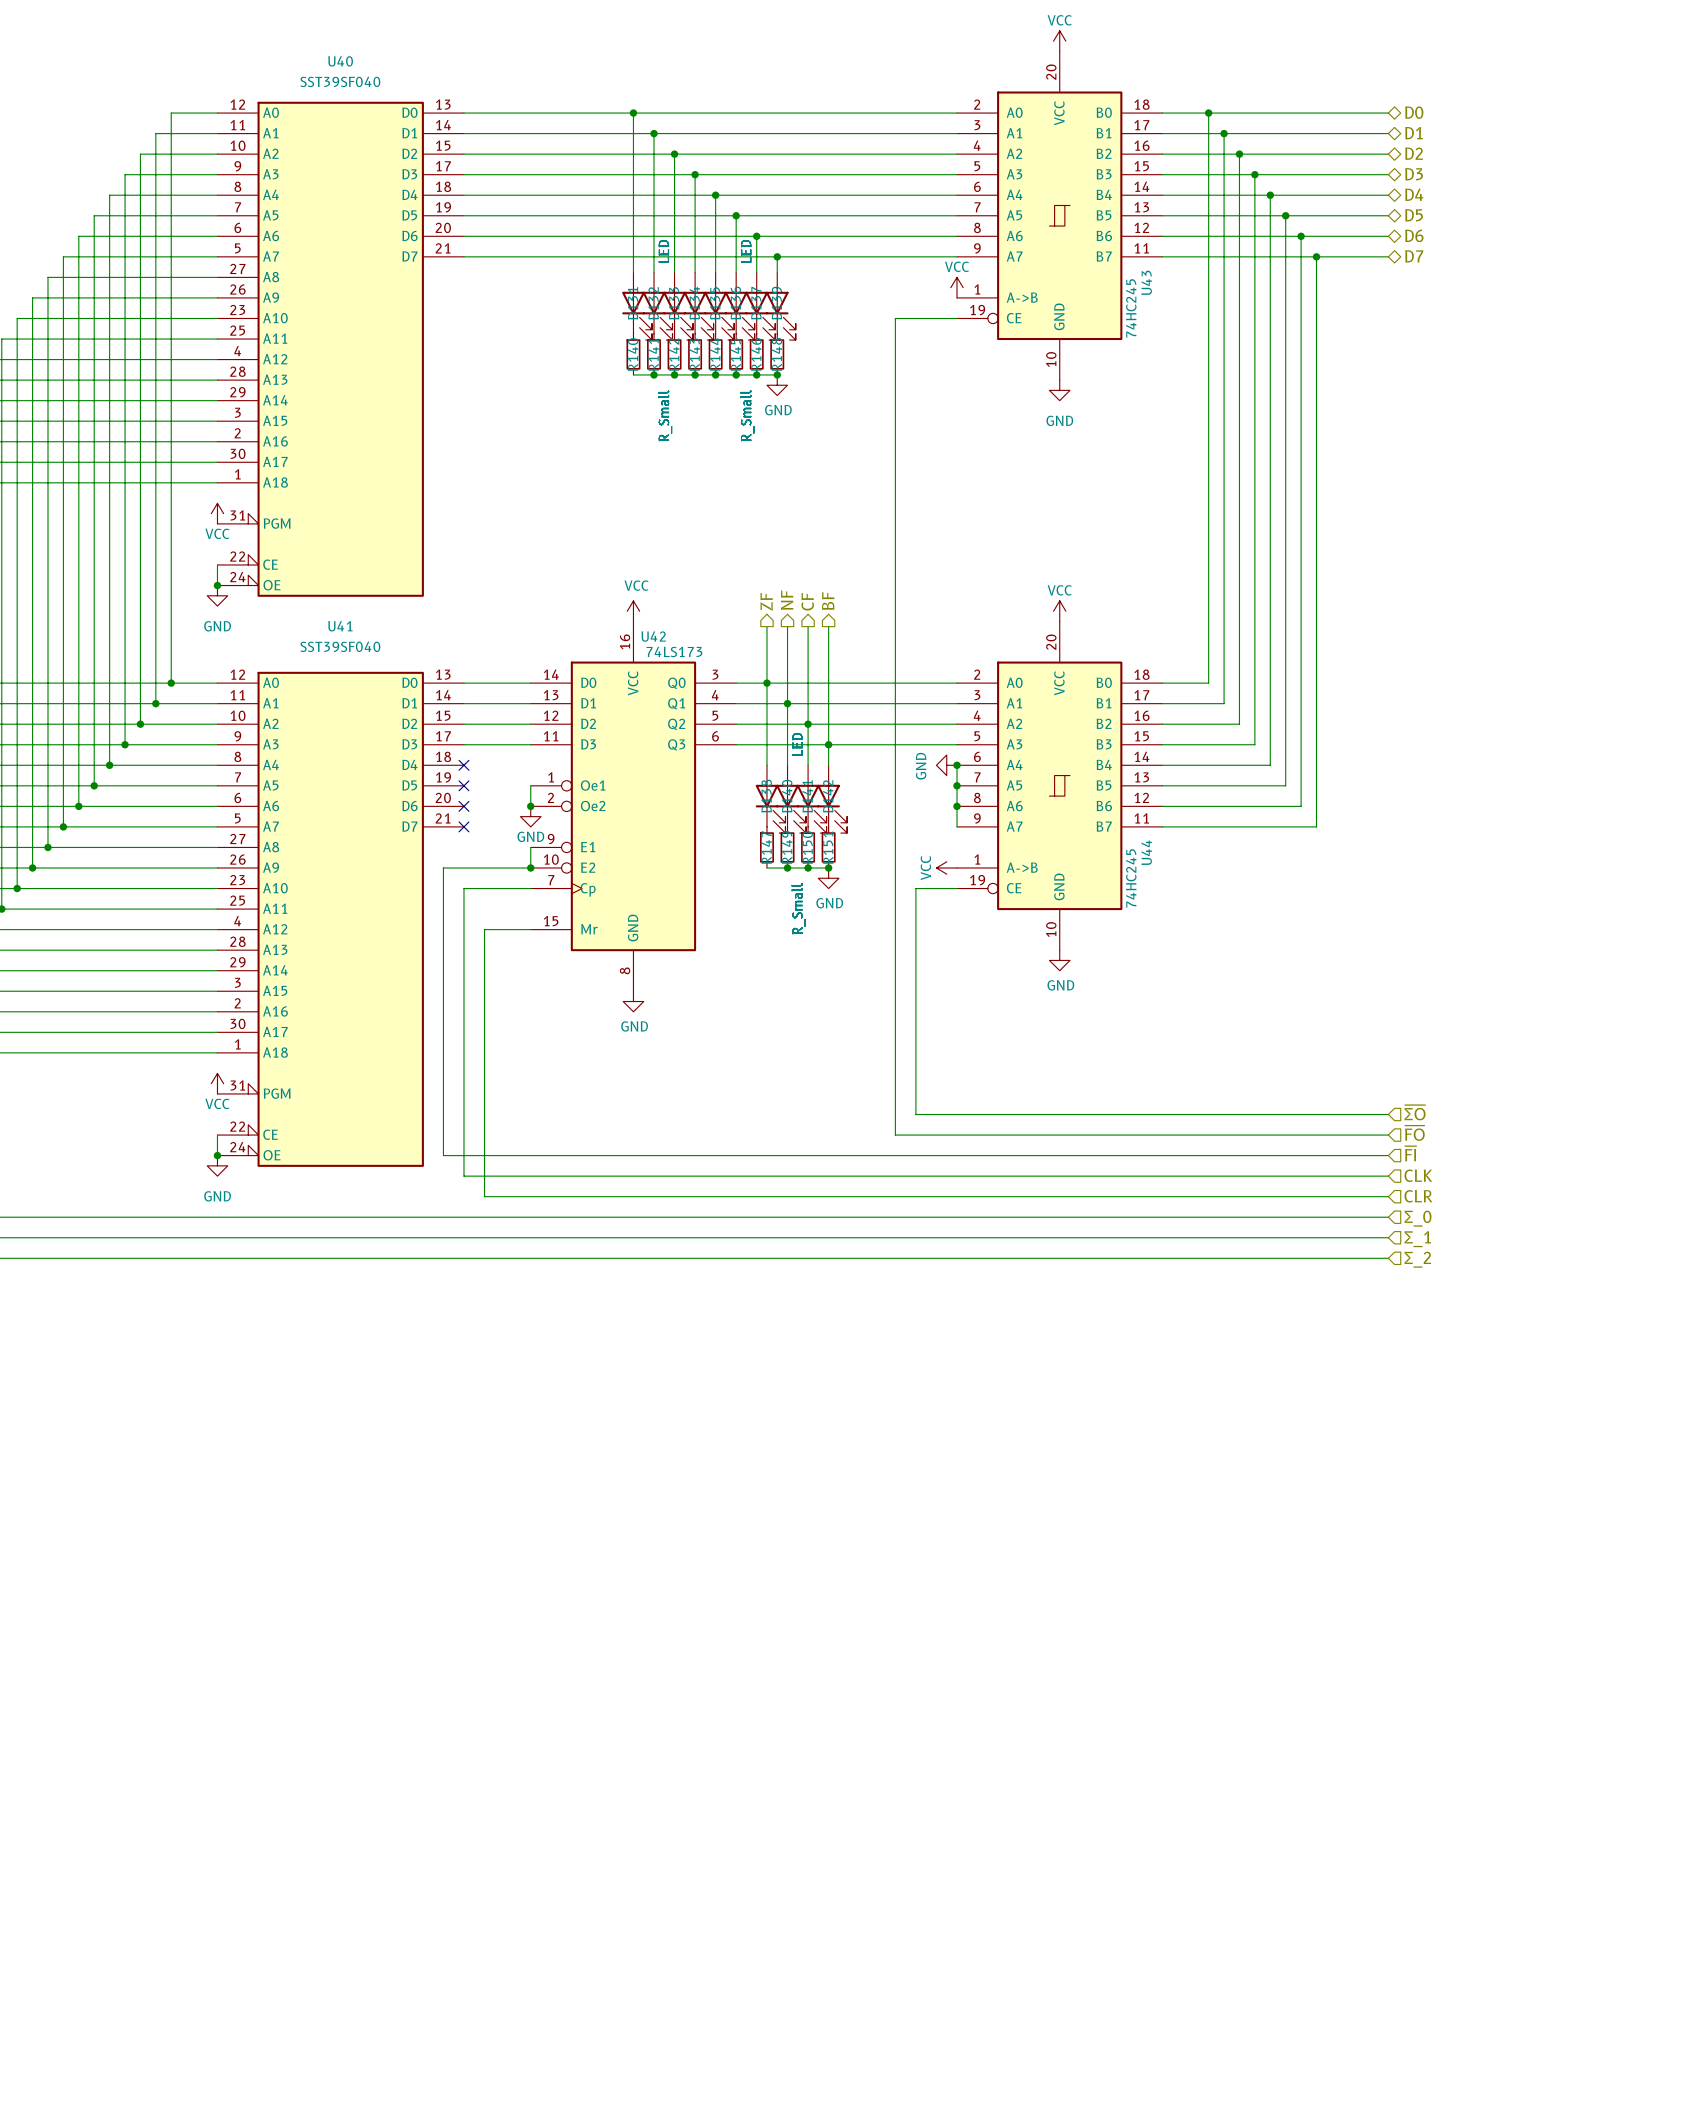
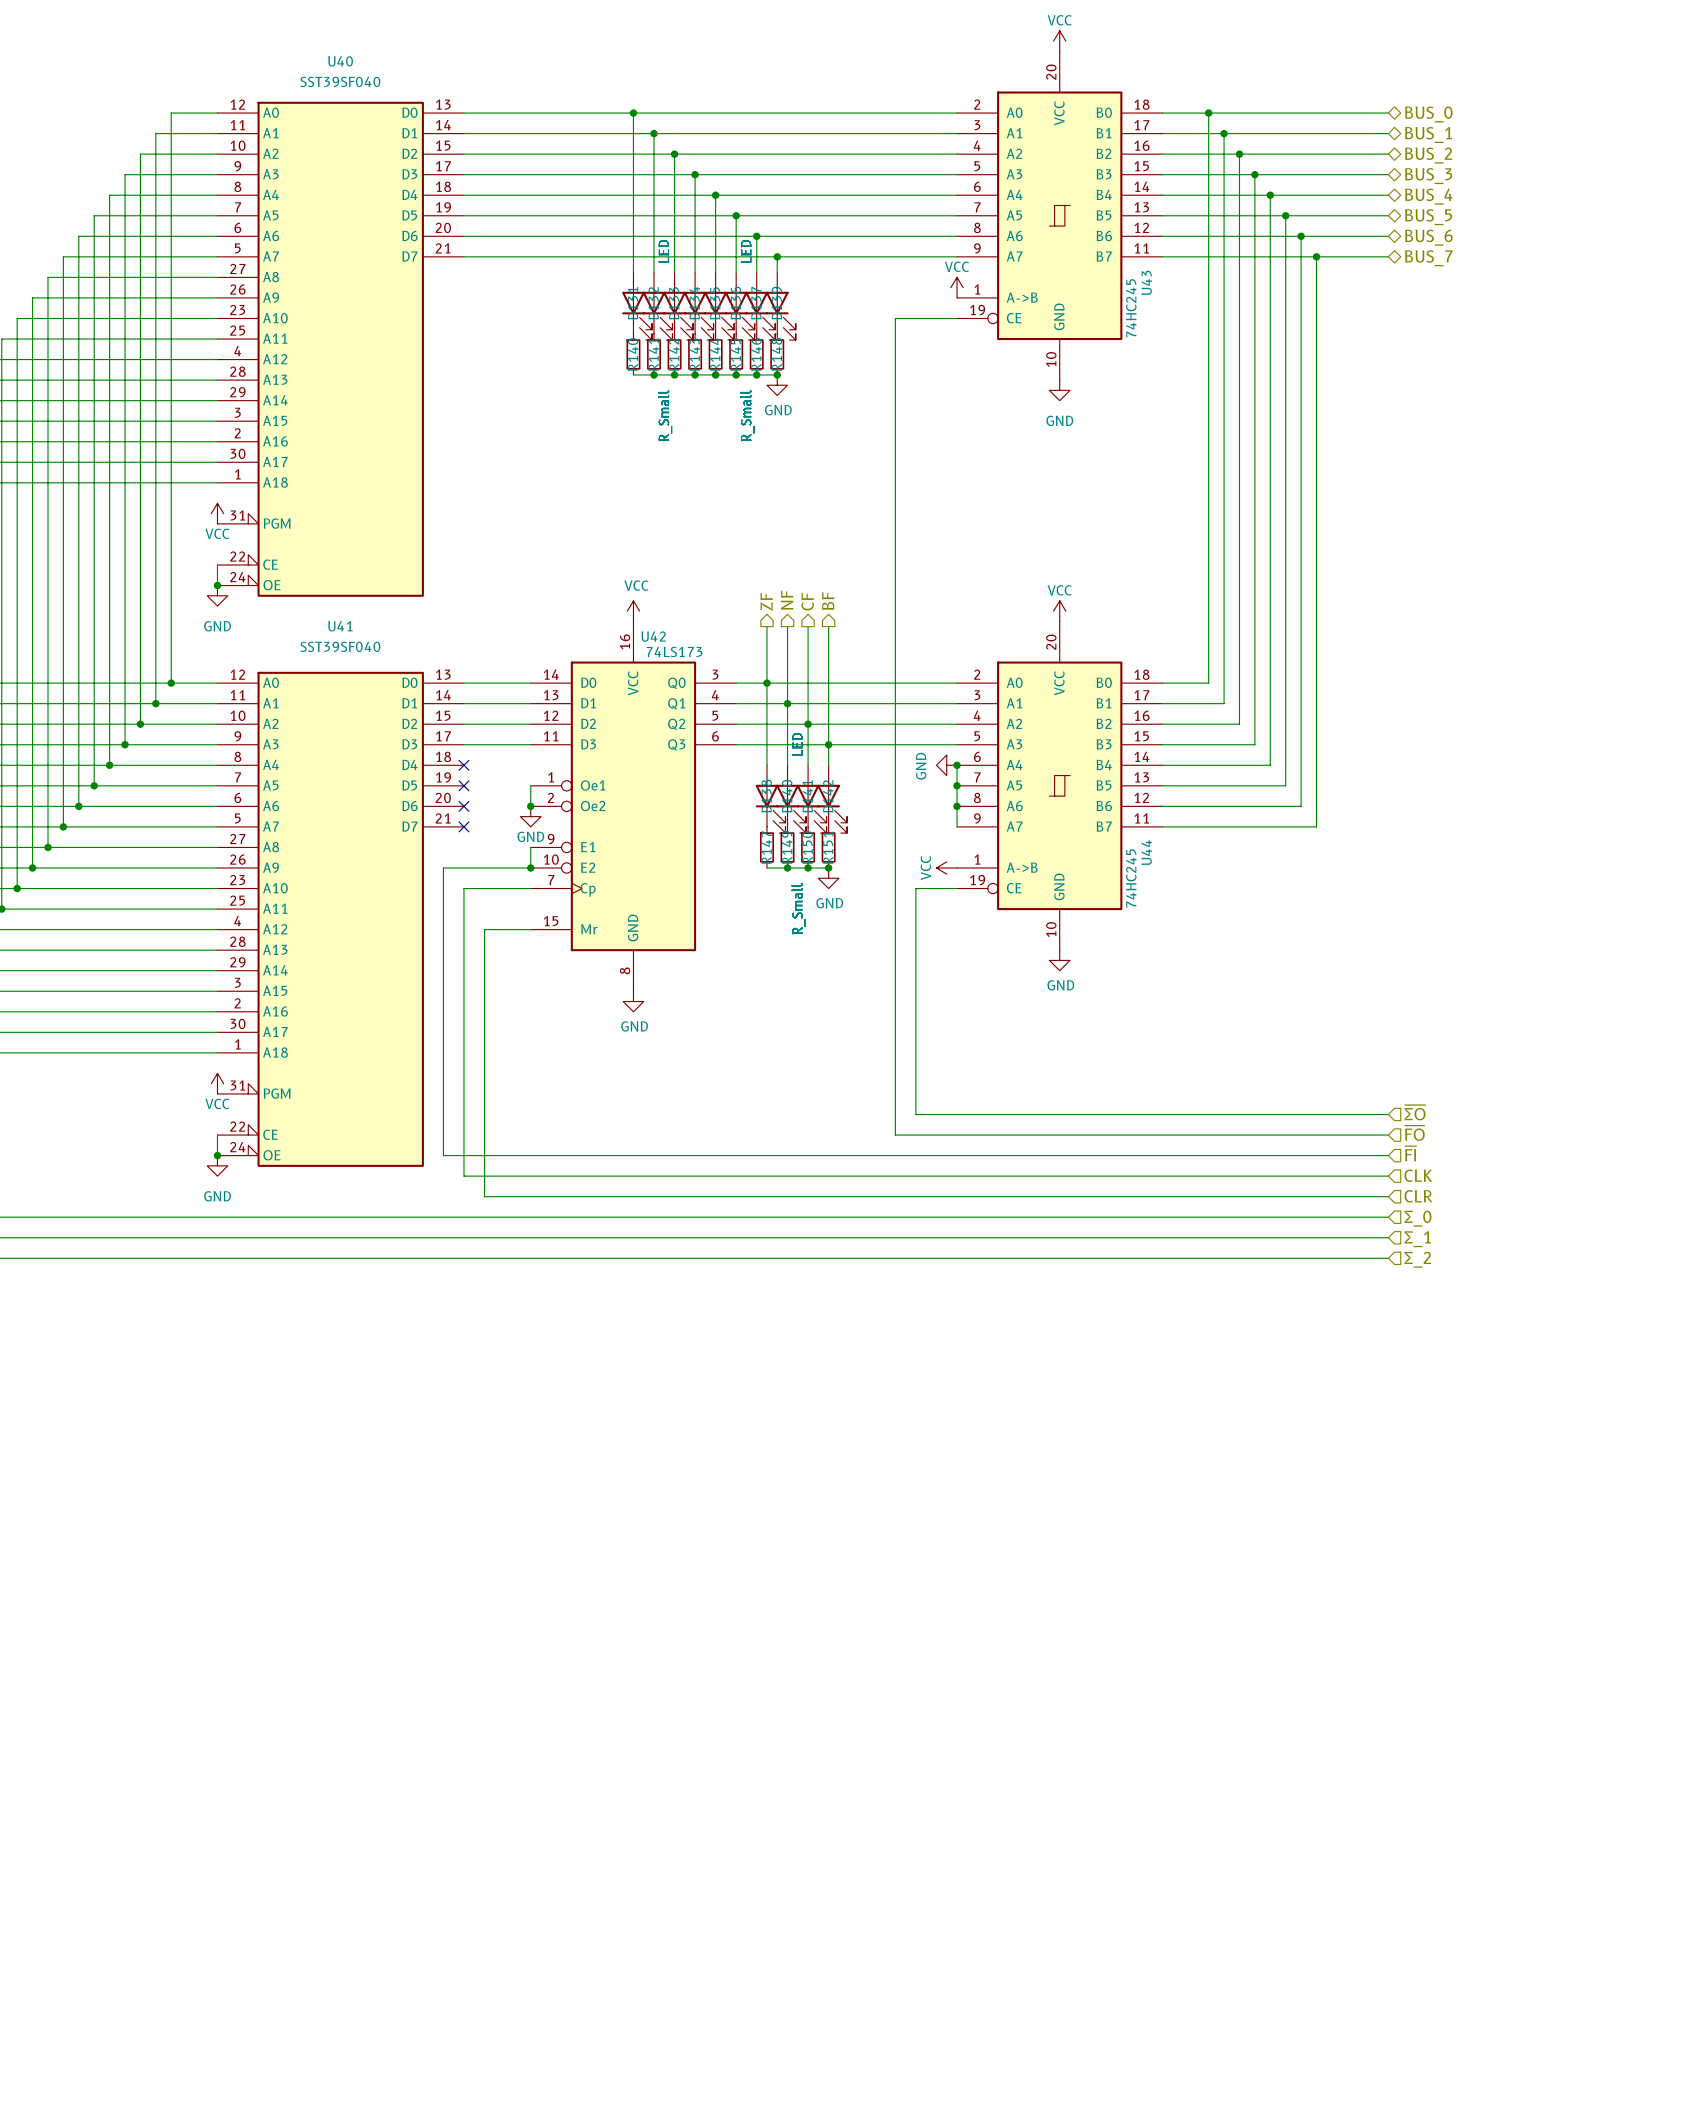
hierarchical label: D0 (1414, 112) -> BUS_0 (1428, 114)
hierarchical label: D1 (1414, 133) -> BUS_1 (1428, 134)
hierarchical label: D2 (1414, 153) -> BUS_2 (1428, 155)
hierarchical label: D3 (1414, 174) -> BUS_3 (1428, 176)
hierarchical label: D4 (1414, 194) -> BUS_4 (1428, 196)
hierarchical label: D5 (1414, 215) -> BUS_5 (1428, 217)
hierarchical label: D6 (1414, 235) -> BUS_6 (1428, 237)
hierarchical label: D7 (1414, 256) -> BUS_7 (1428, 258)

